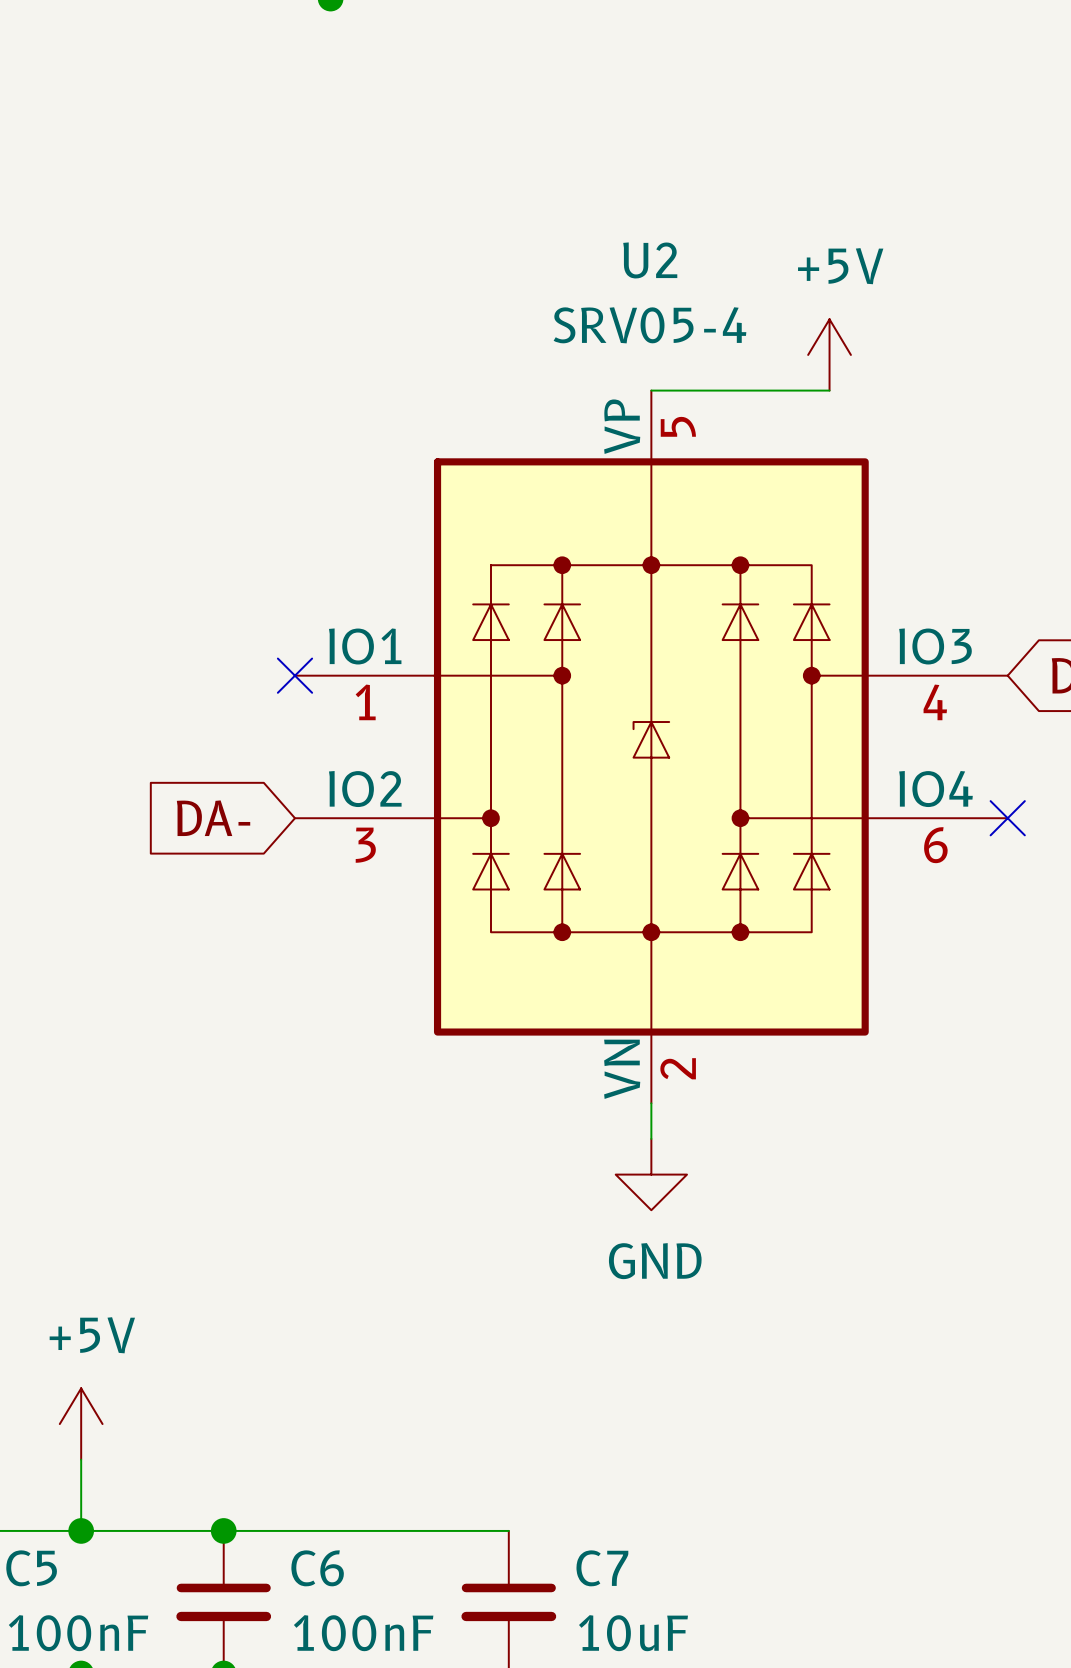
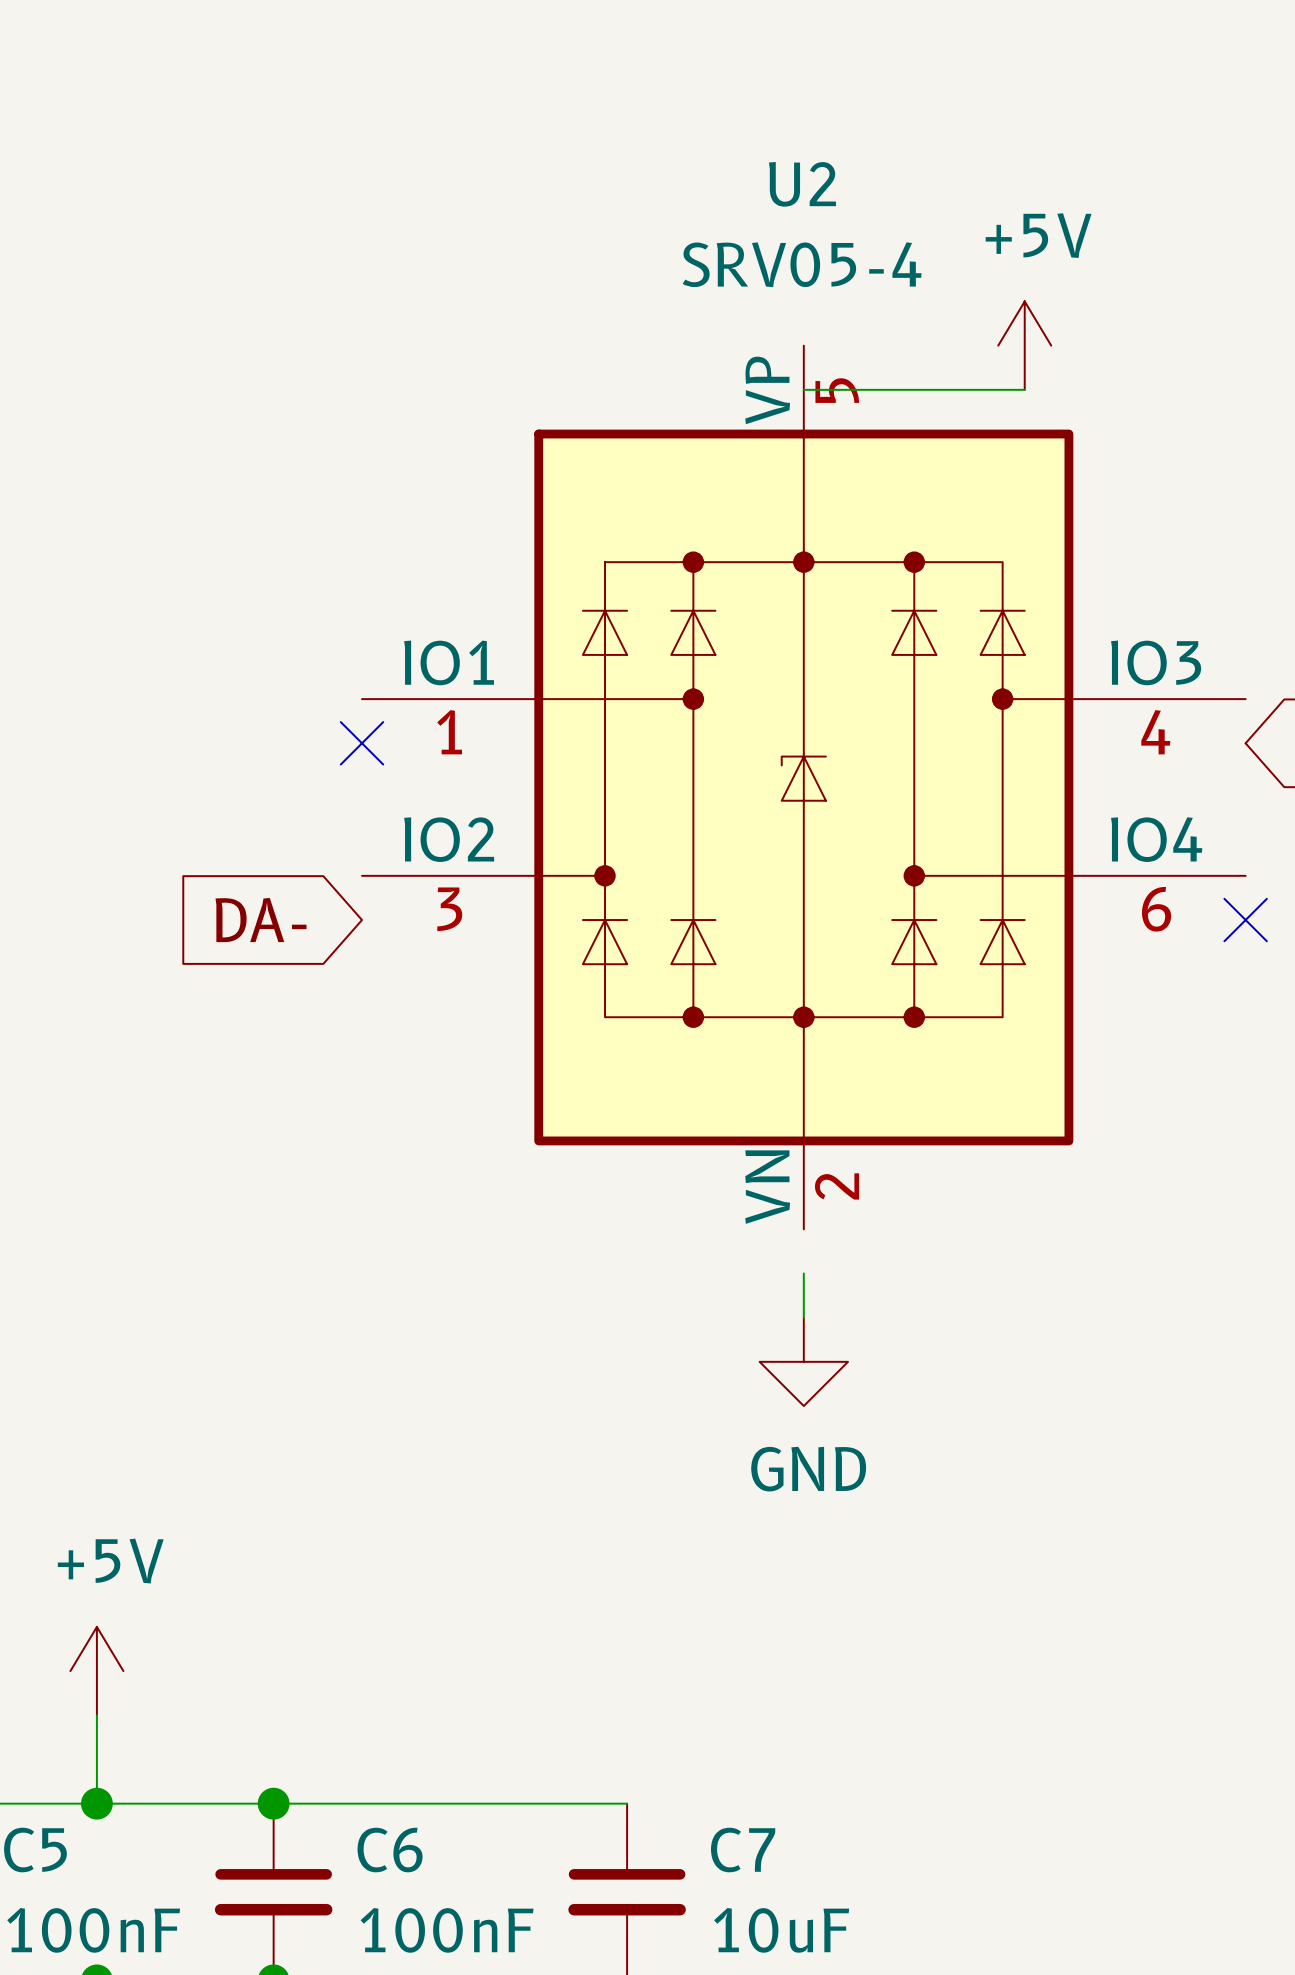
U2 position: (651, 746) -> (803, 787)

